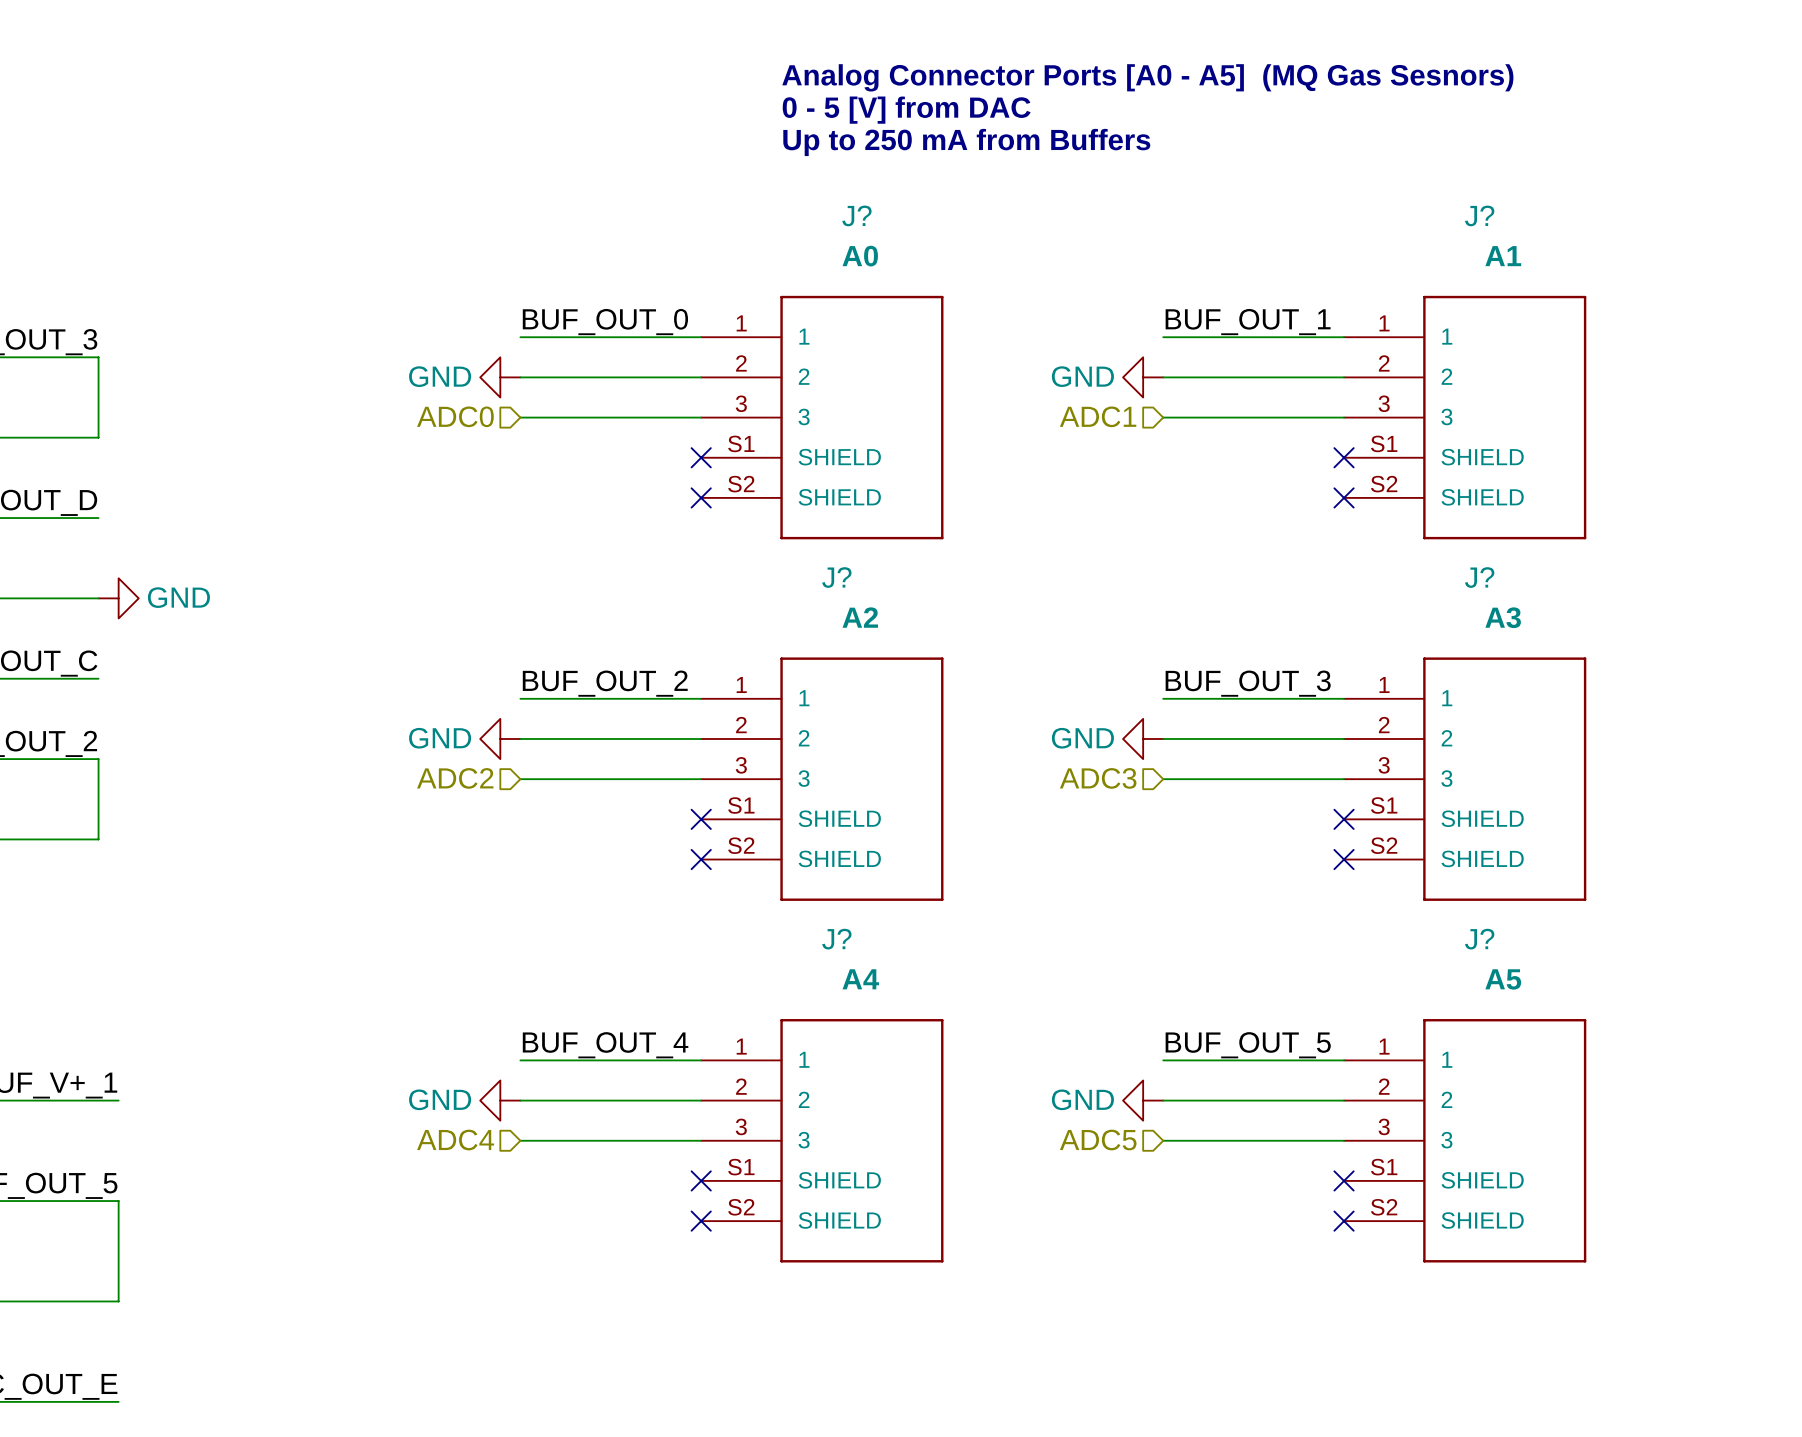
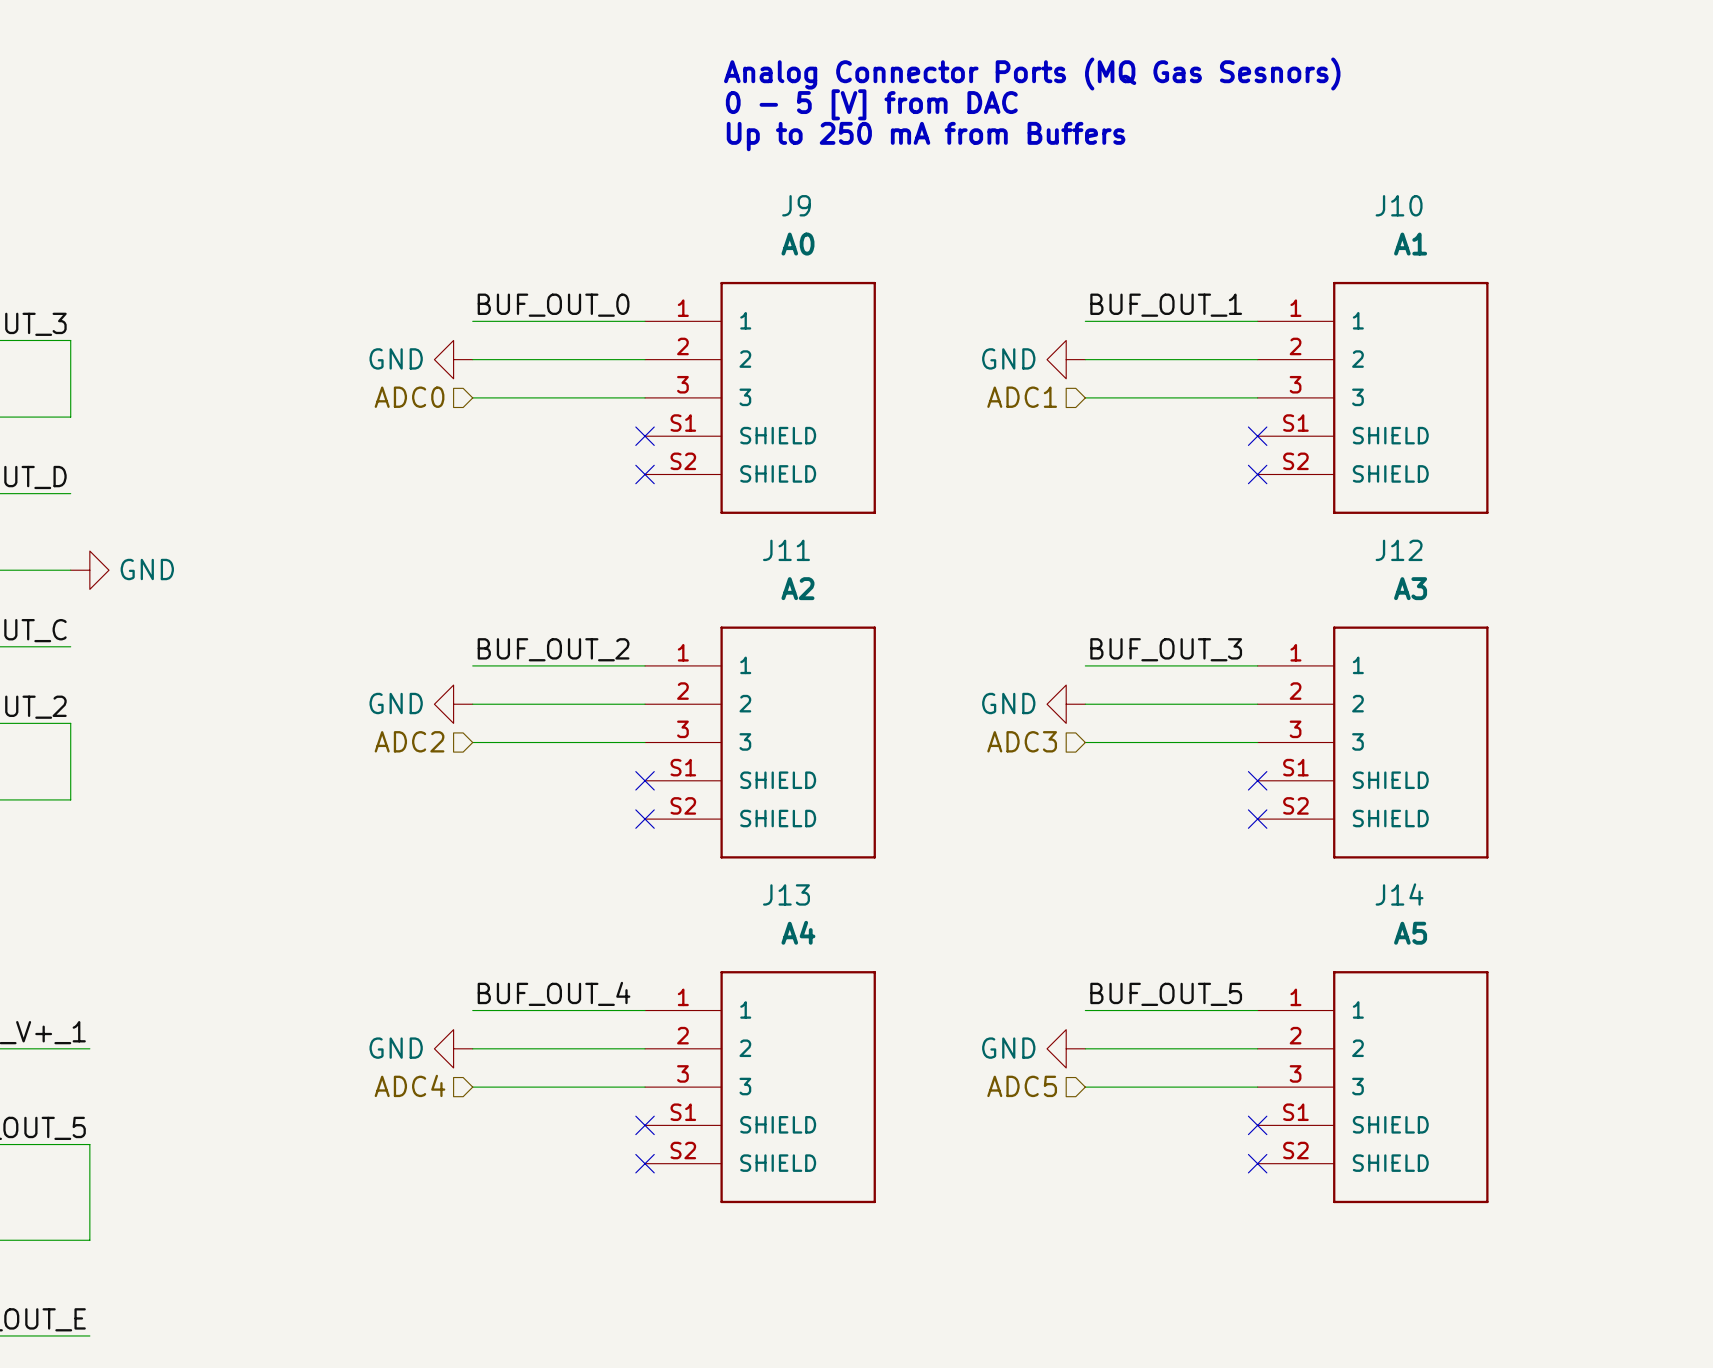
text: Analog Connector Ports [A0 - A5] (MQ Gas Sesnors) (1147, 77) -> Analog Connector Ports (MQ Gas Sesnors) (1032, 74)
J? name: J? (856, 215) -> J9 (796, 205)
J? name: J? (1479, 215) -> J10 (1399, 205)
J? name: J? (836, 577) -> J11 (786, 550)
J? name: J? (1479, 577) -> J12 (1399, 550)
J? name: J? (836, 939) -> J13 (786, 894)
J? name: J? (1479, 939) -> J14 (1399, 894)

